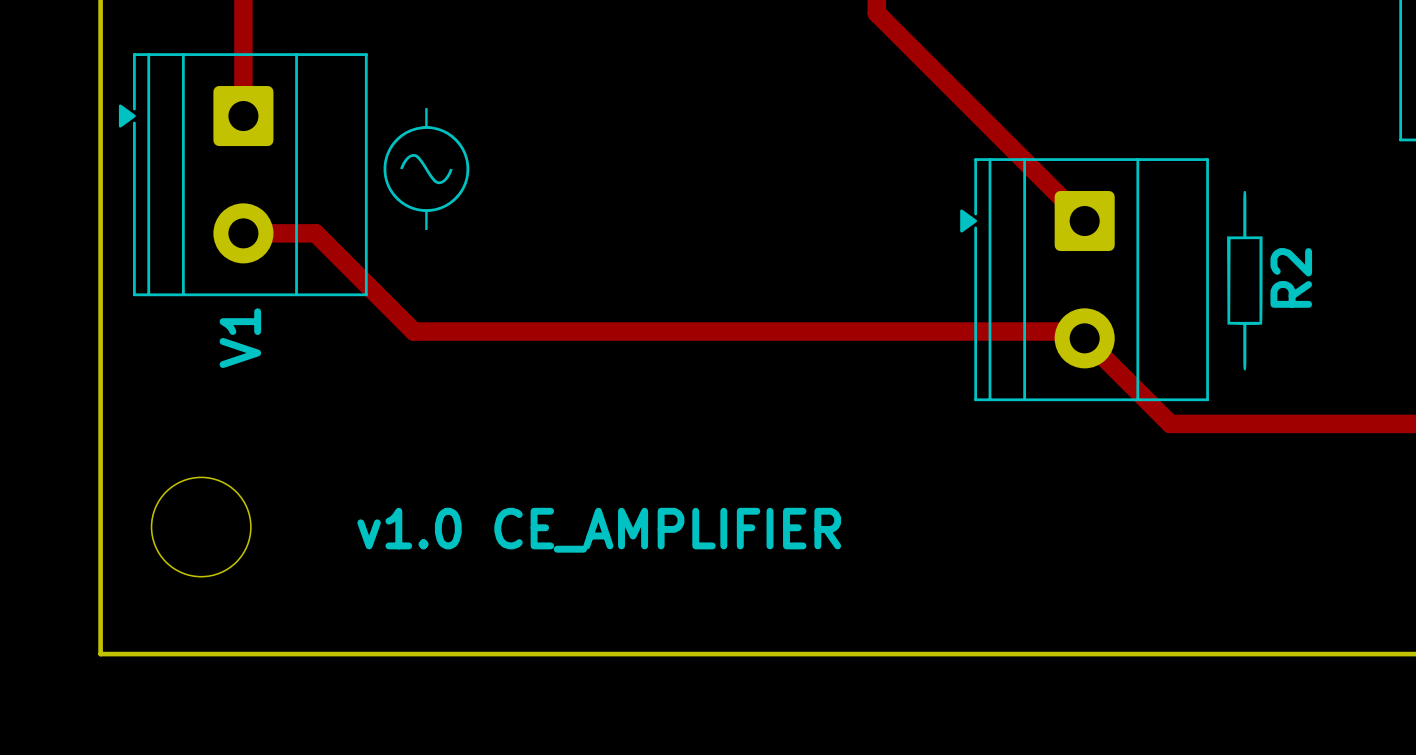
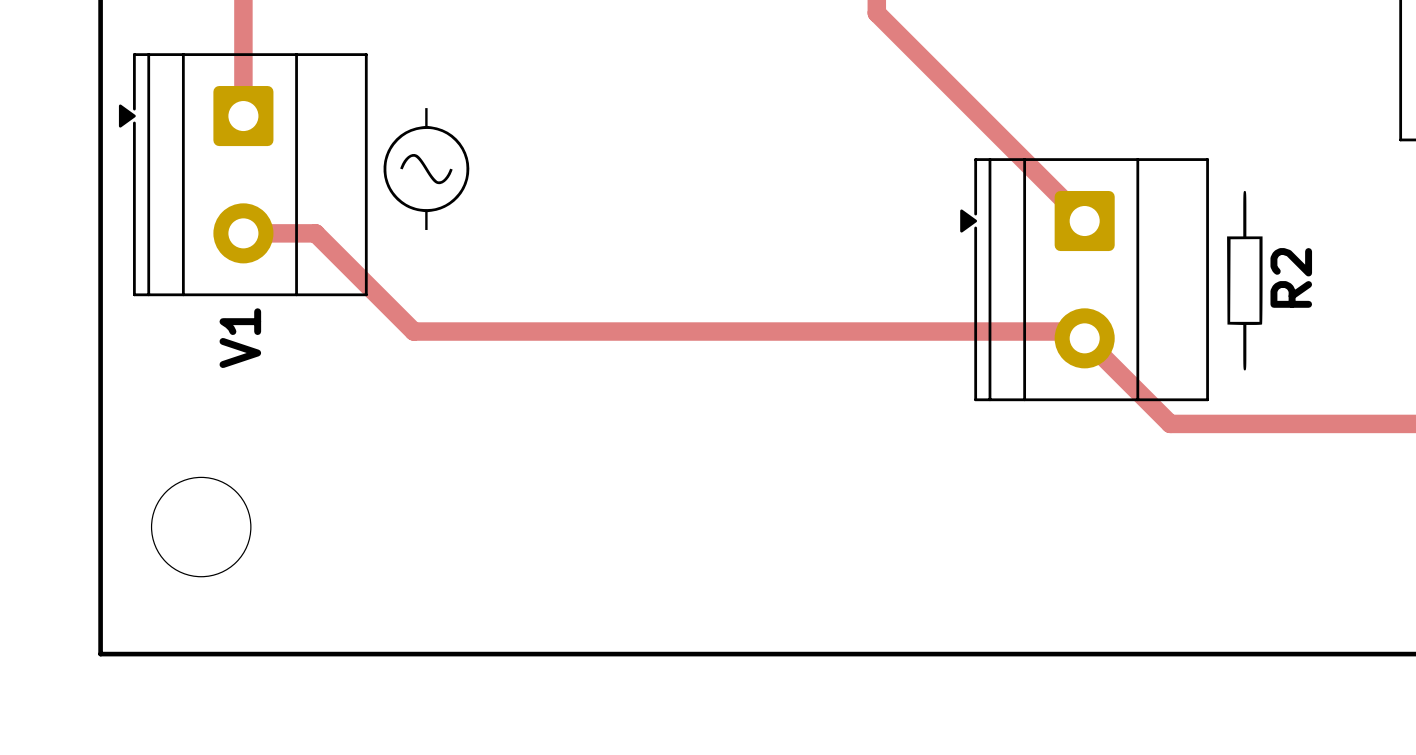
text: v1.0 CE_AMPLIFIER (599, 530) -> none

